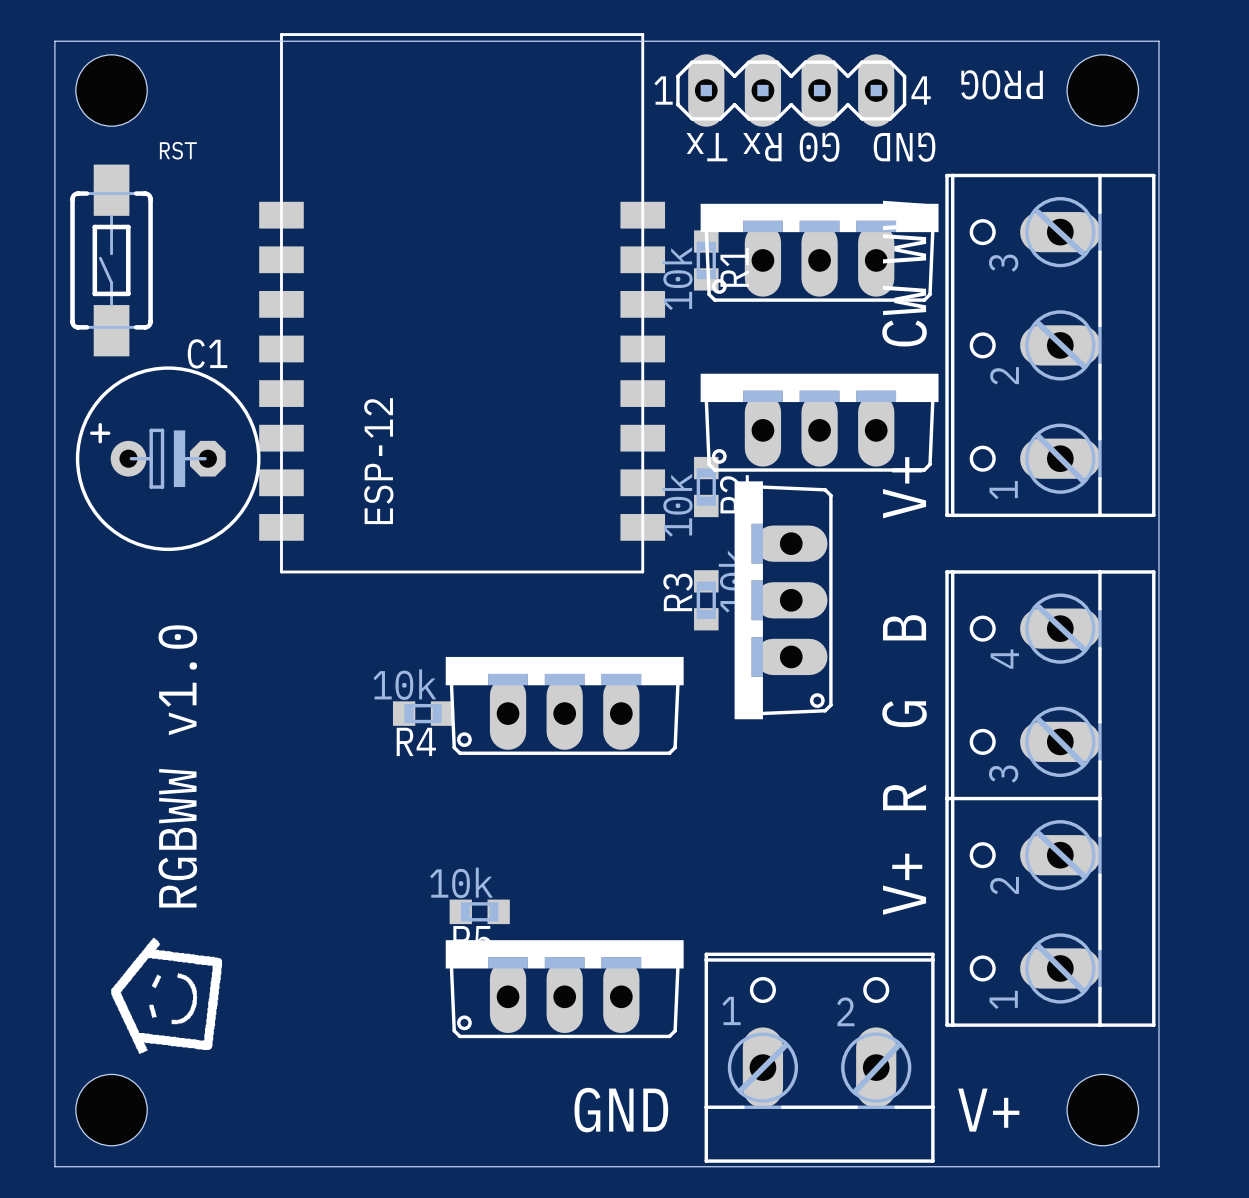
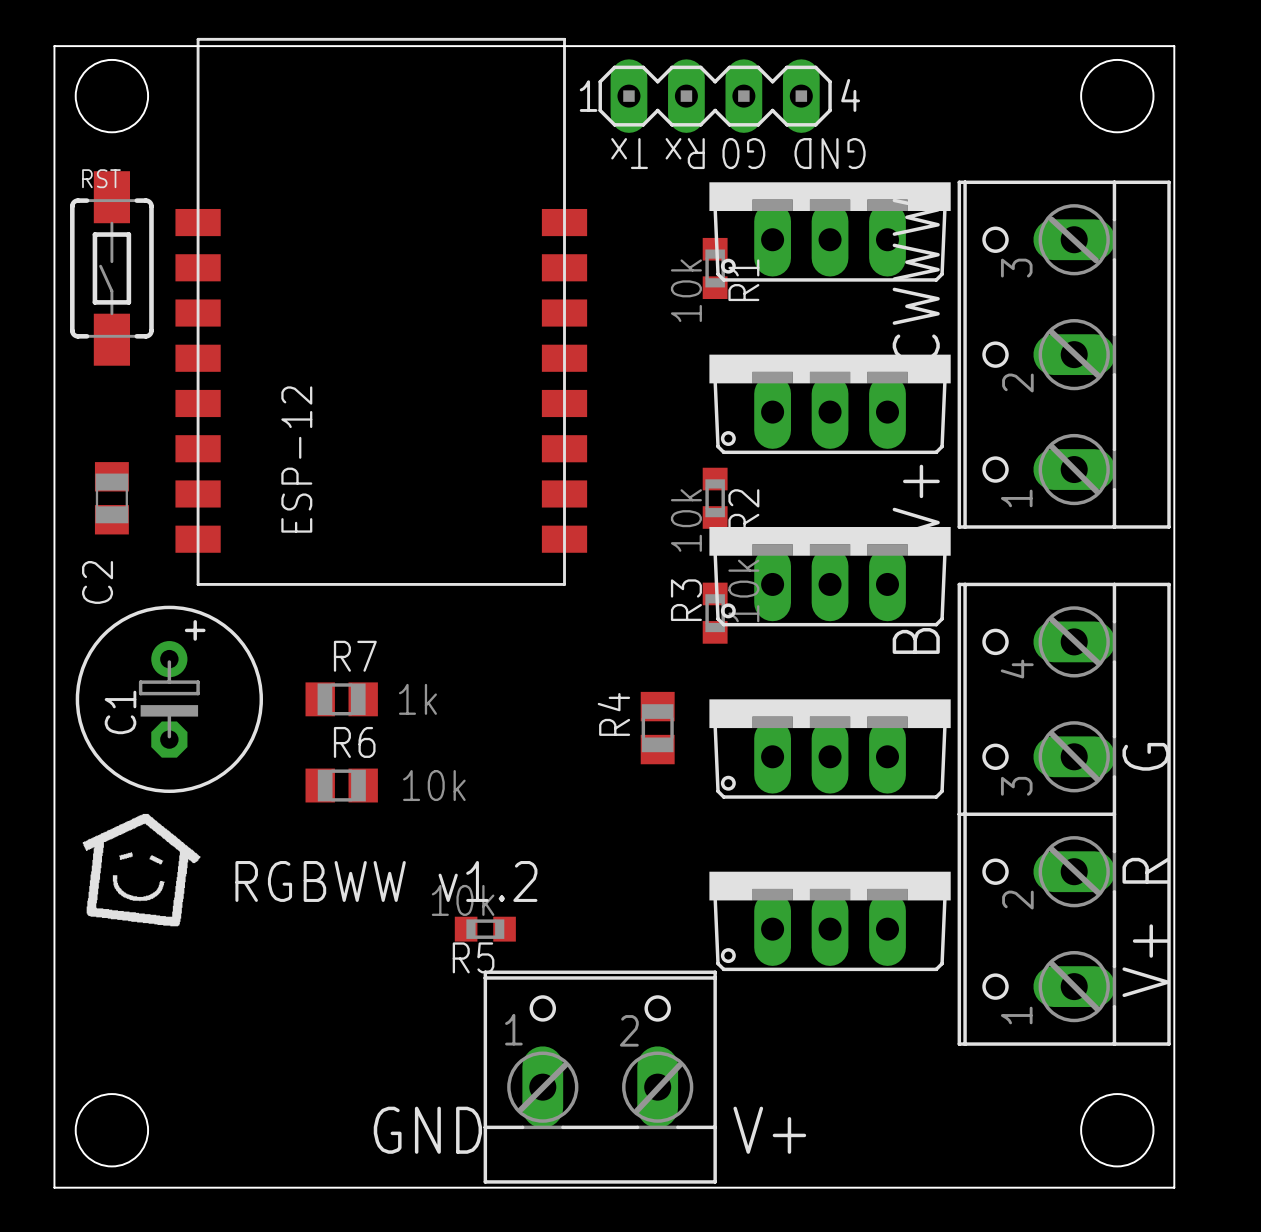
part: none -> (715, 96)
PROG: (791, 90) -> none
text position: Tx (706, 147) -> Tx (629, 153)
text: none -> G0 (743, 153)
text position: Rx (762, 147) -> Rx (685, 153)
text: G0 (819, 147) -> GND (830, 153)
text: GND (904, 147) -> none
RST name position: RST (178, 150) -> RST (101, 178)
part position: (819, 252) -> (830, 231)
ESP-12 position: (462, 303) -> (381, 311)
C1 name position: C1 (207, 353) -> C1 (120, 712)
part position: (819, 422) -> (830, 404)
C1 rotation: 0° (168, 458) -> 90° clockwise (169, 699)
C1 position: (168, 458) -> (169, 699)
C2: none -> (111, 498)
part rotation: 0° (783, 600) -> 90° clockwise (830, 576)
R4 value: 10k (404, 684) -> none
R7: none -> 1k (341, 699)
R4 footprint: [392, 701, 454, 726] -> [640, 691, 675, 765]
part: (564, 705) -> none
text position: G (904, 714) -> G (1146, 756)
part: none -> (830, 749)
R4 name position: R4 (416, 741) -> R4 (613, 714)
text: RGBWW v1.0 (177, 766) -> none
R6: none -> 10k (341, 785)
text position: R (904, 797) -> R (1146, 870)
drawing: none -> [82, 813, 201, 927]
text: none -> RGBWW v1.2 (386, 881)
text: V+ (904, 884) -> none
part: none -> (830, 921)
drawing: [111, 937, 223, 1054] -> none
text: none -> V+ (1146, 960)
part: (564, 989) -> none
part position: (819, 1057) -> (600, 1077)
text position: GND (621, 1110) -> GND (427, 1130)
text: none -> V+ (769, 1130)
text: V+ (988, 1110) -> none

